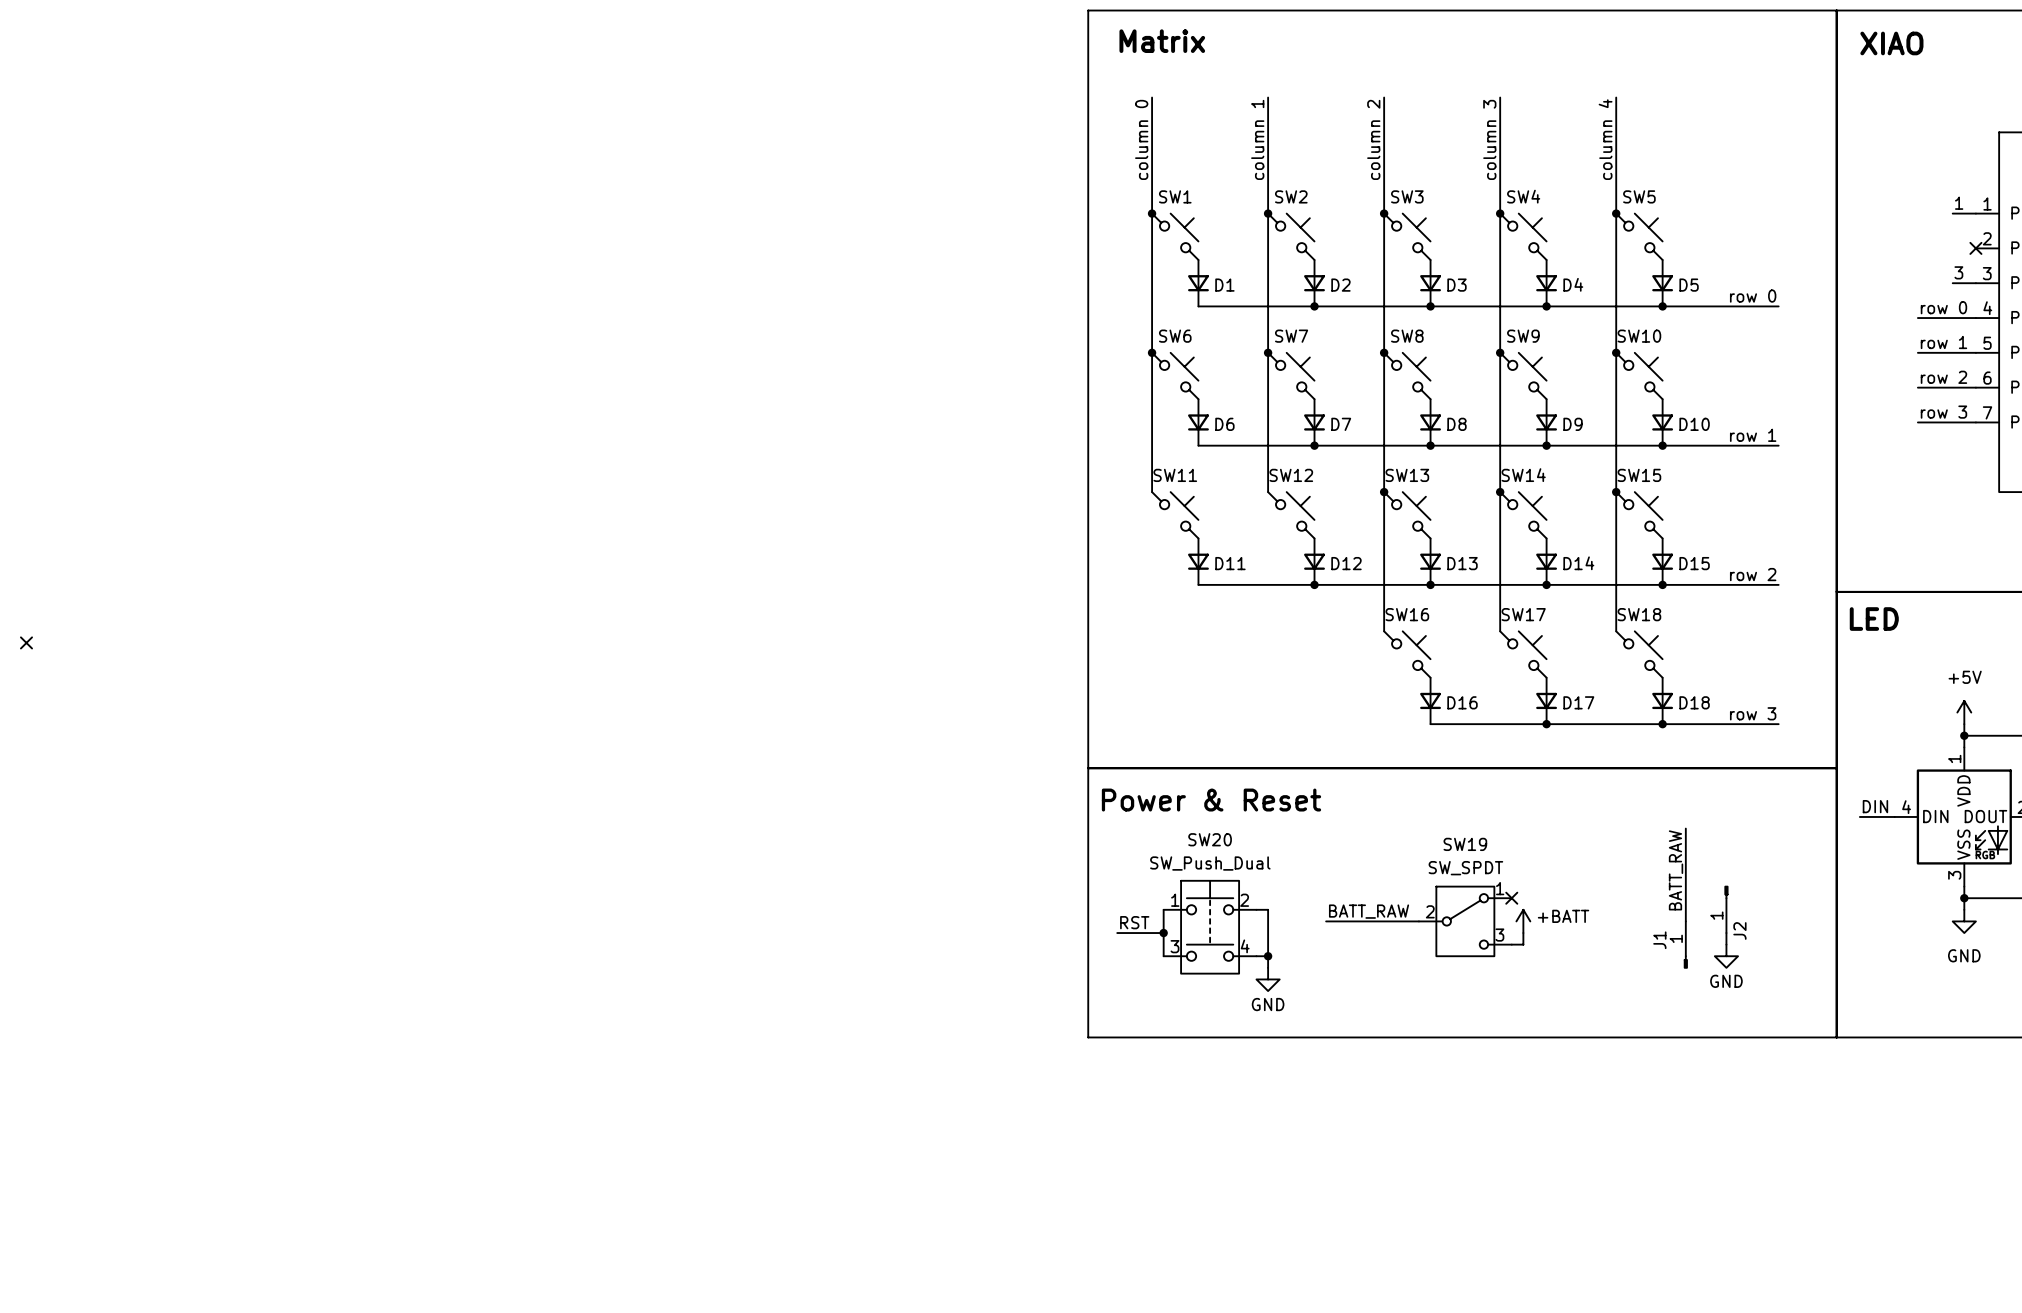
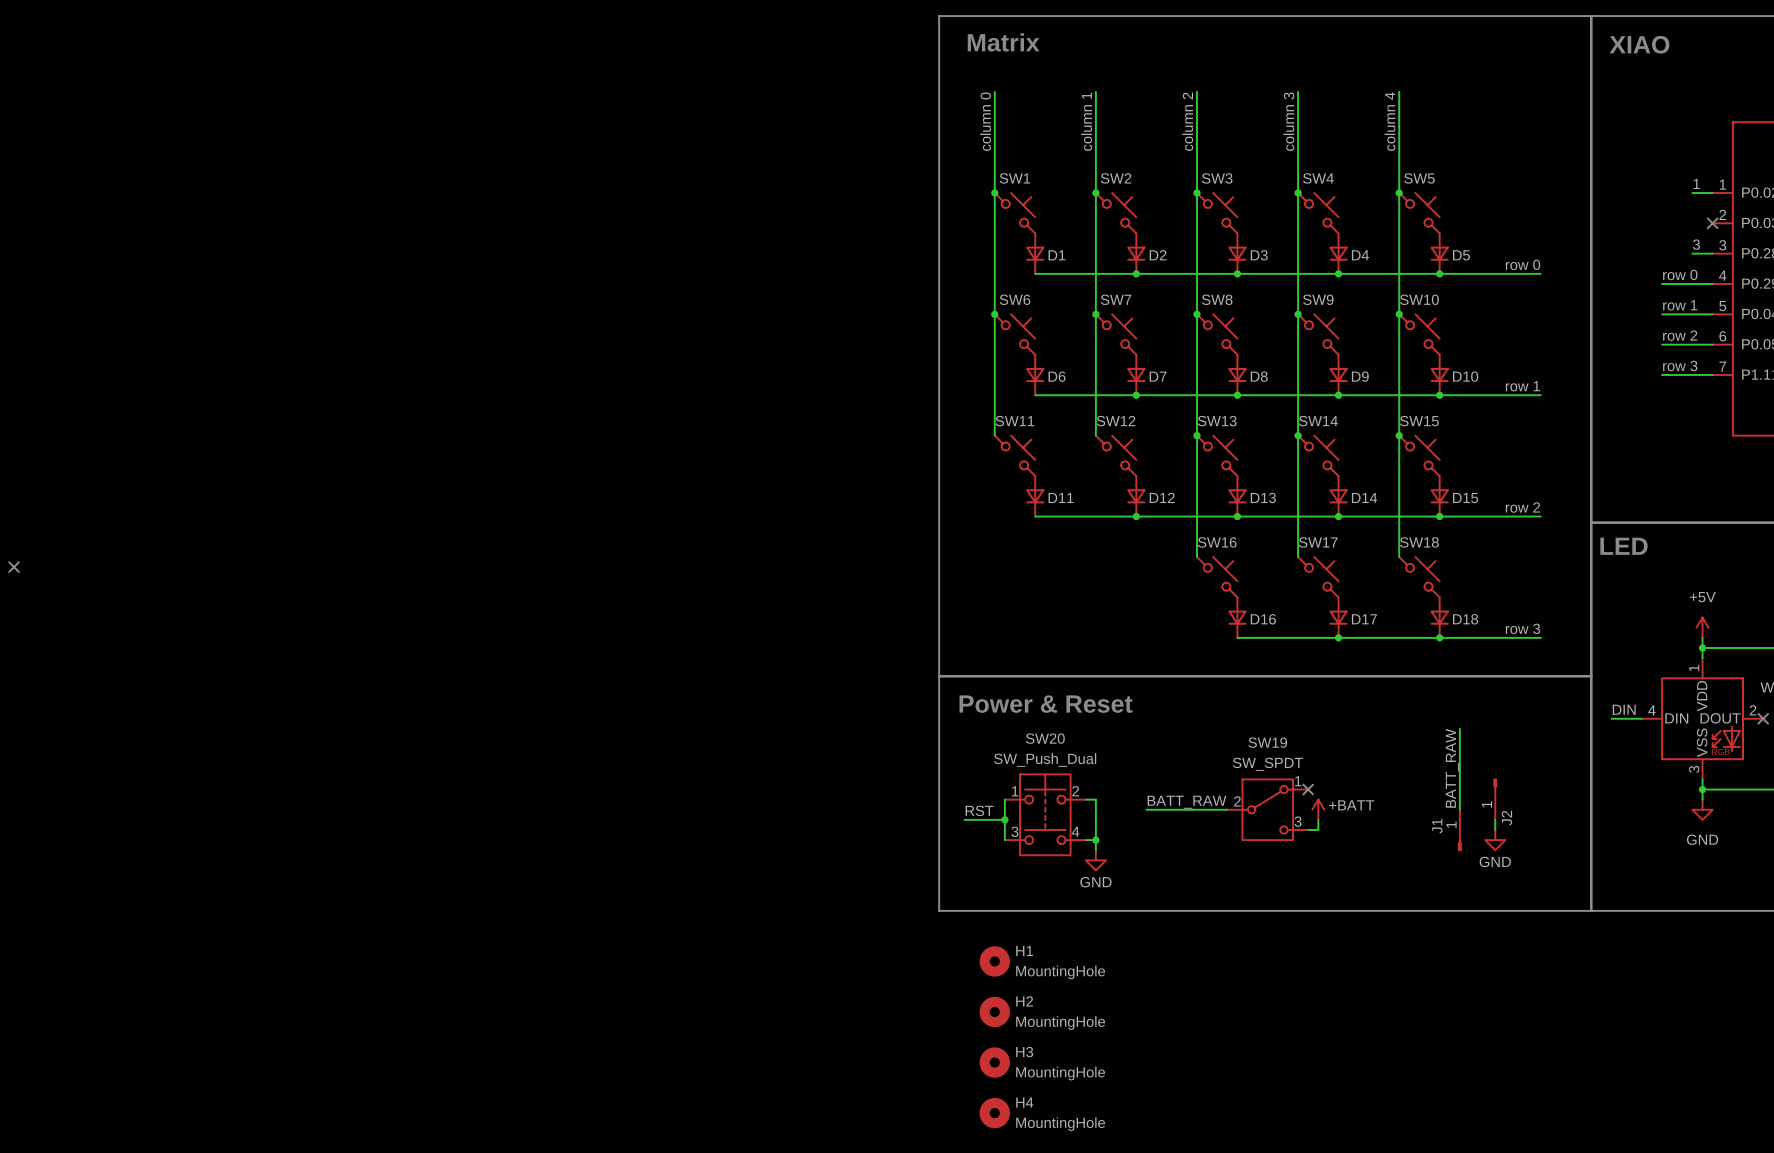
H1: none -> MountingHole (994, 961)
H2: none -> MountingHole (994, 1011)
H3: none -> MountingHole (994, 1062)
H4: none -> MountingHole (994, 1113)

